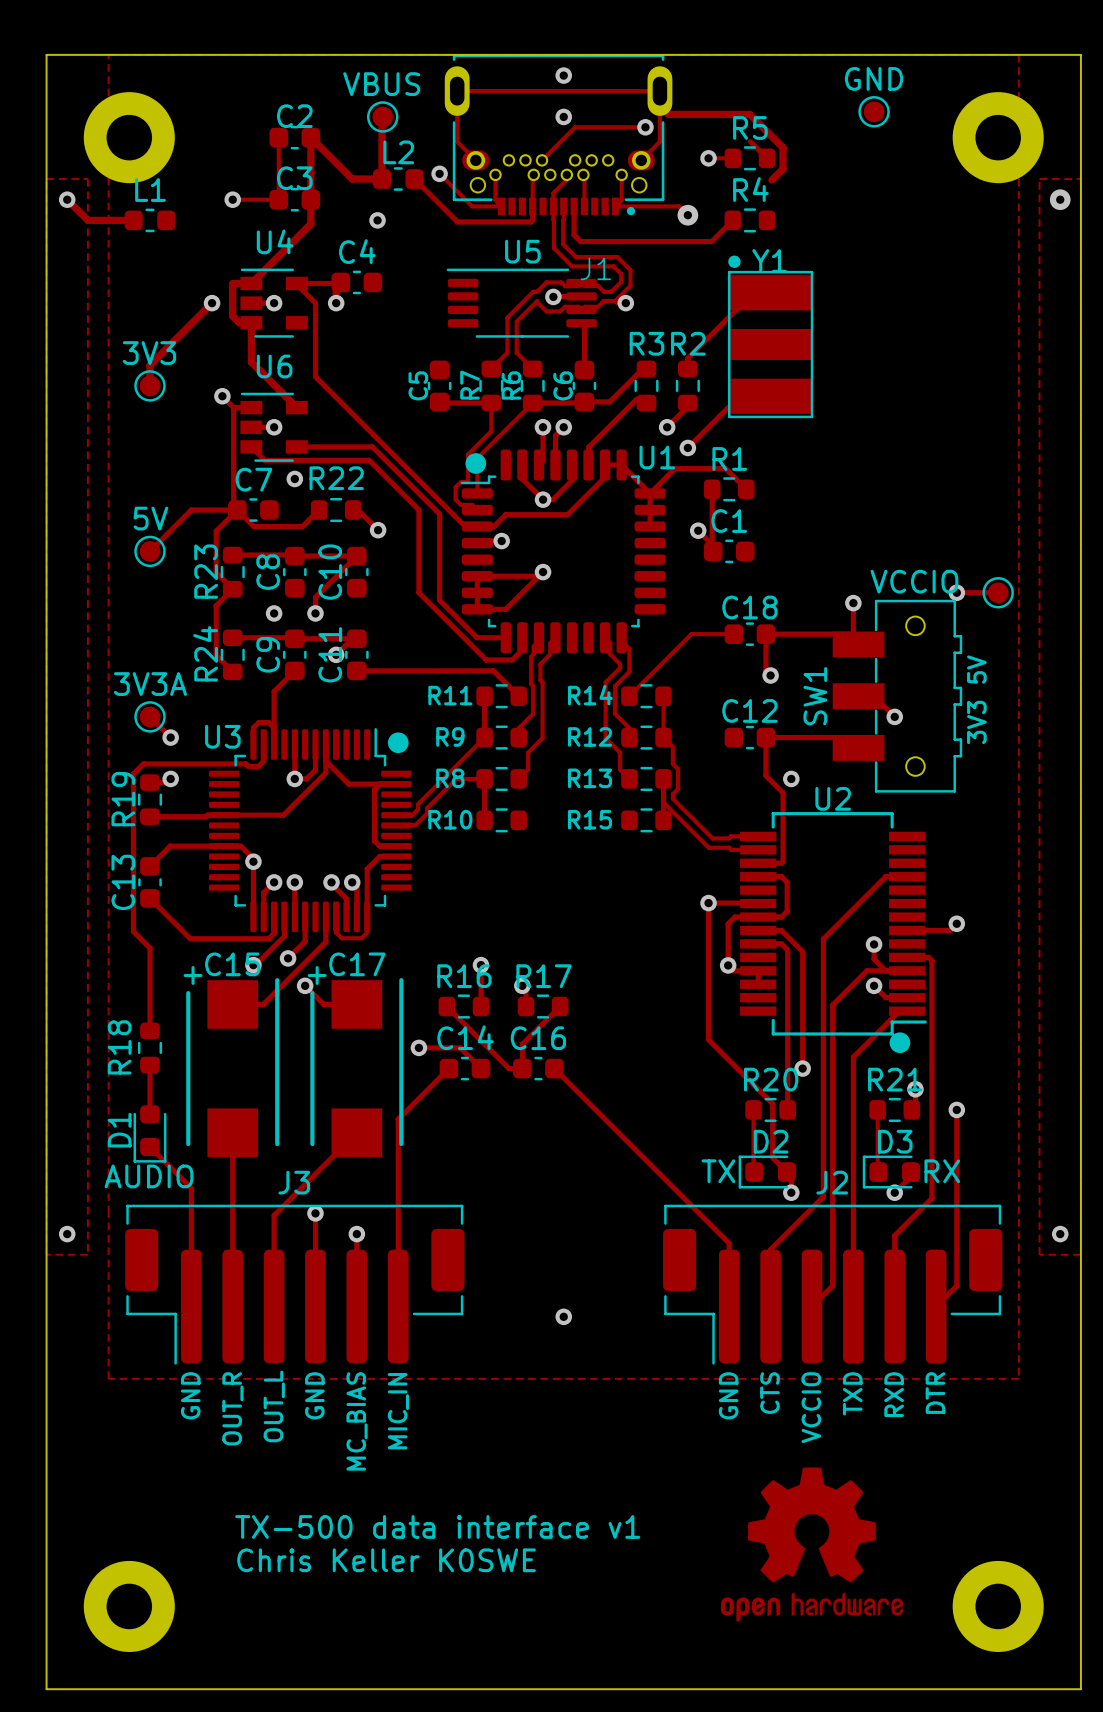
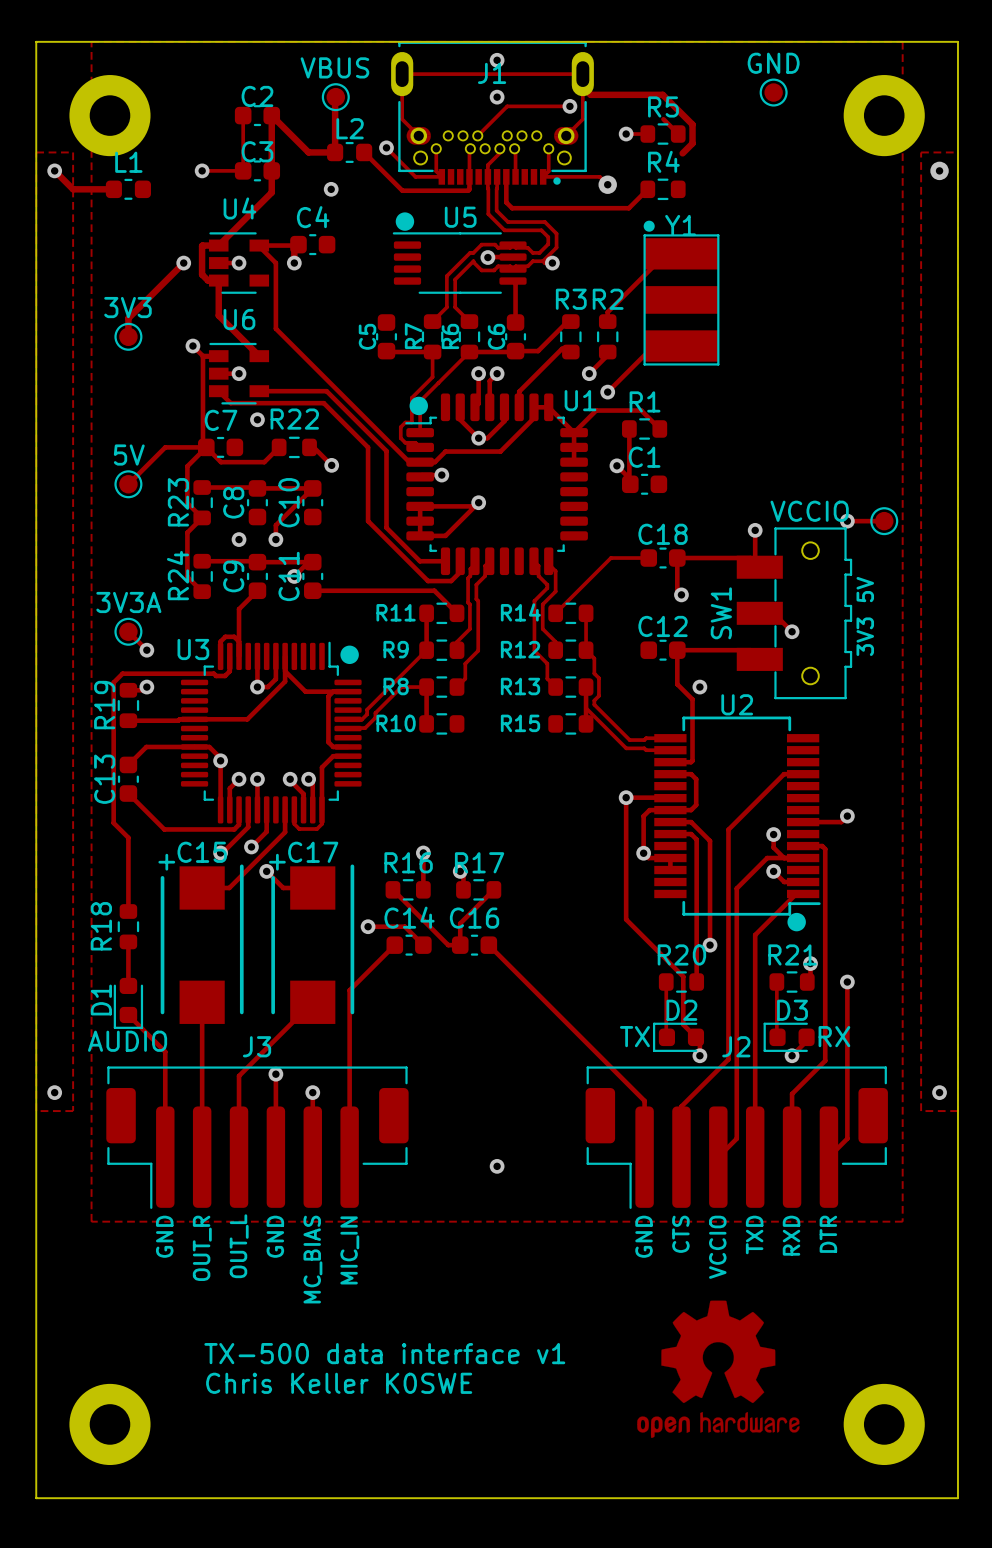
U5 footprint: [446, 268, 597, 338] -> [392, 212, 527, 294]
J1 name position: J1 (595, 268) -> J1 (492, 73)

